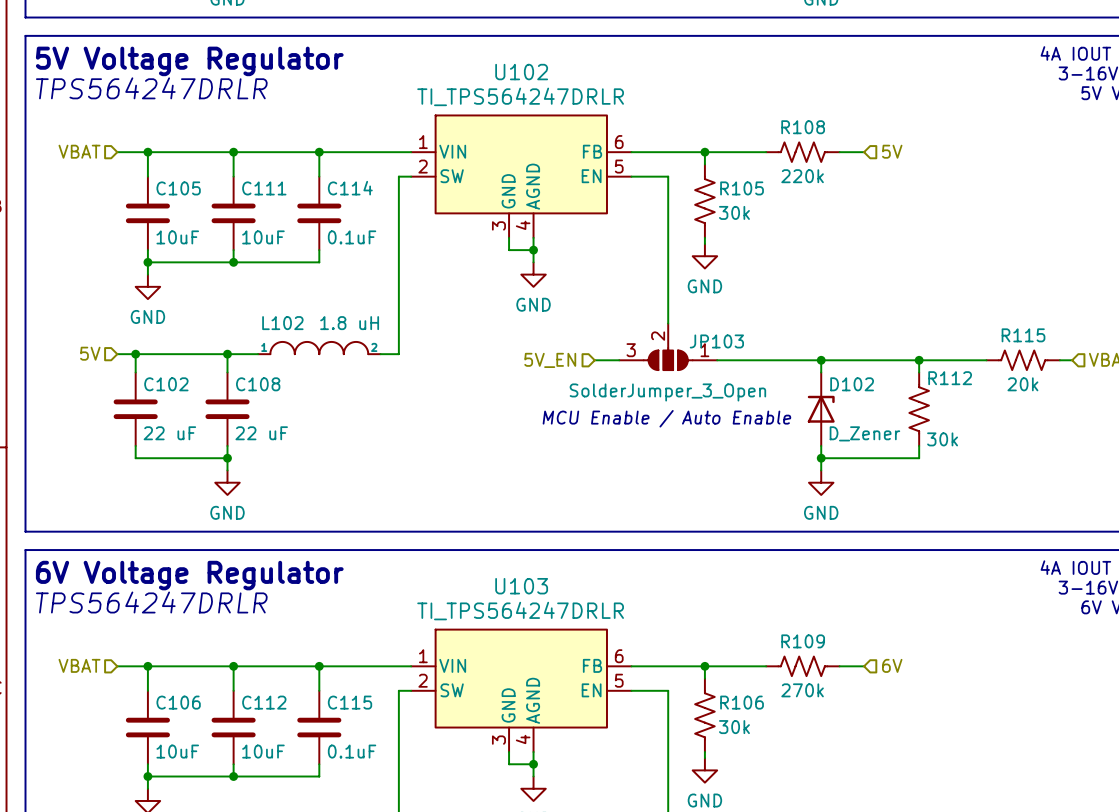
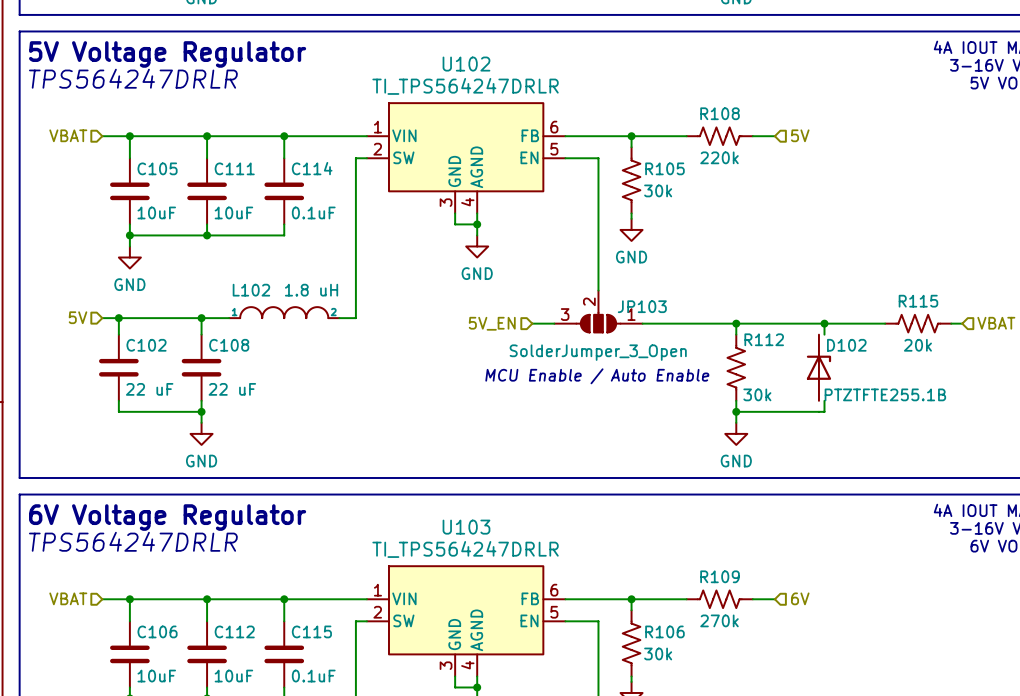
D102 position: (821, 409) -> (818, 367)
R112 position: (919, 409) -> (736, 367)
D102 value: D_Zener (864, 433) -> PTZTFTE255.1B (885, 394)

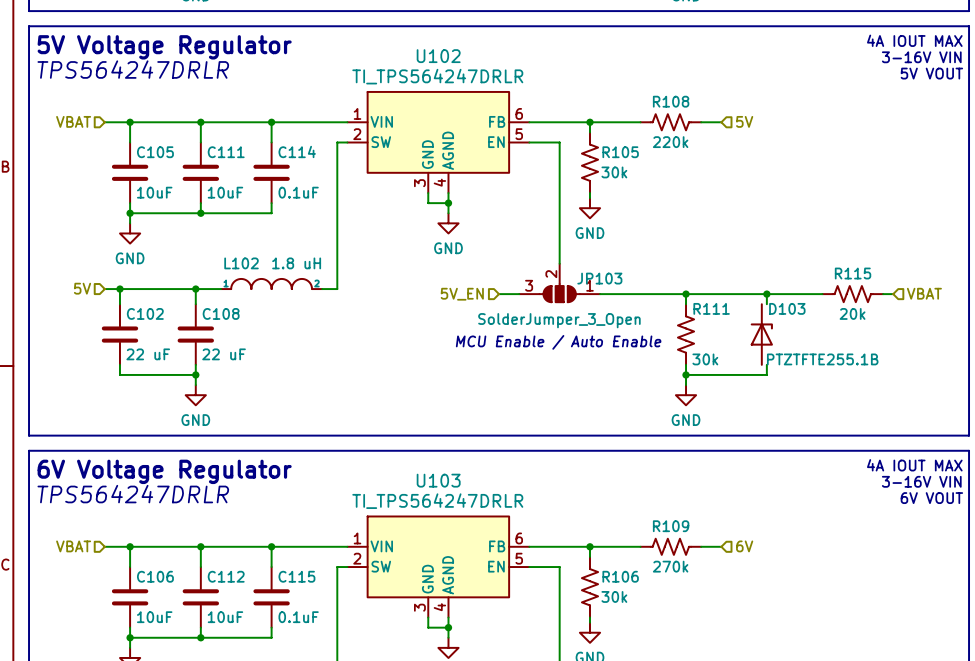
R112 name: R112 (764, 339) -> R111 (711, 308)
D102 name: D102 (846, 345) -> D103 (787, 308)

